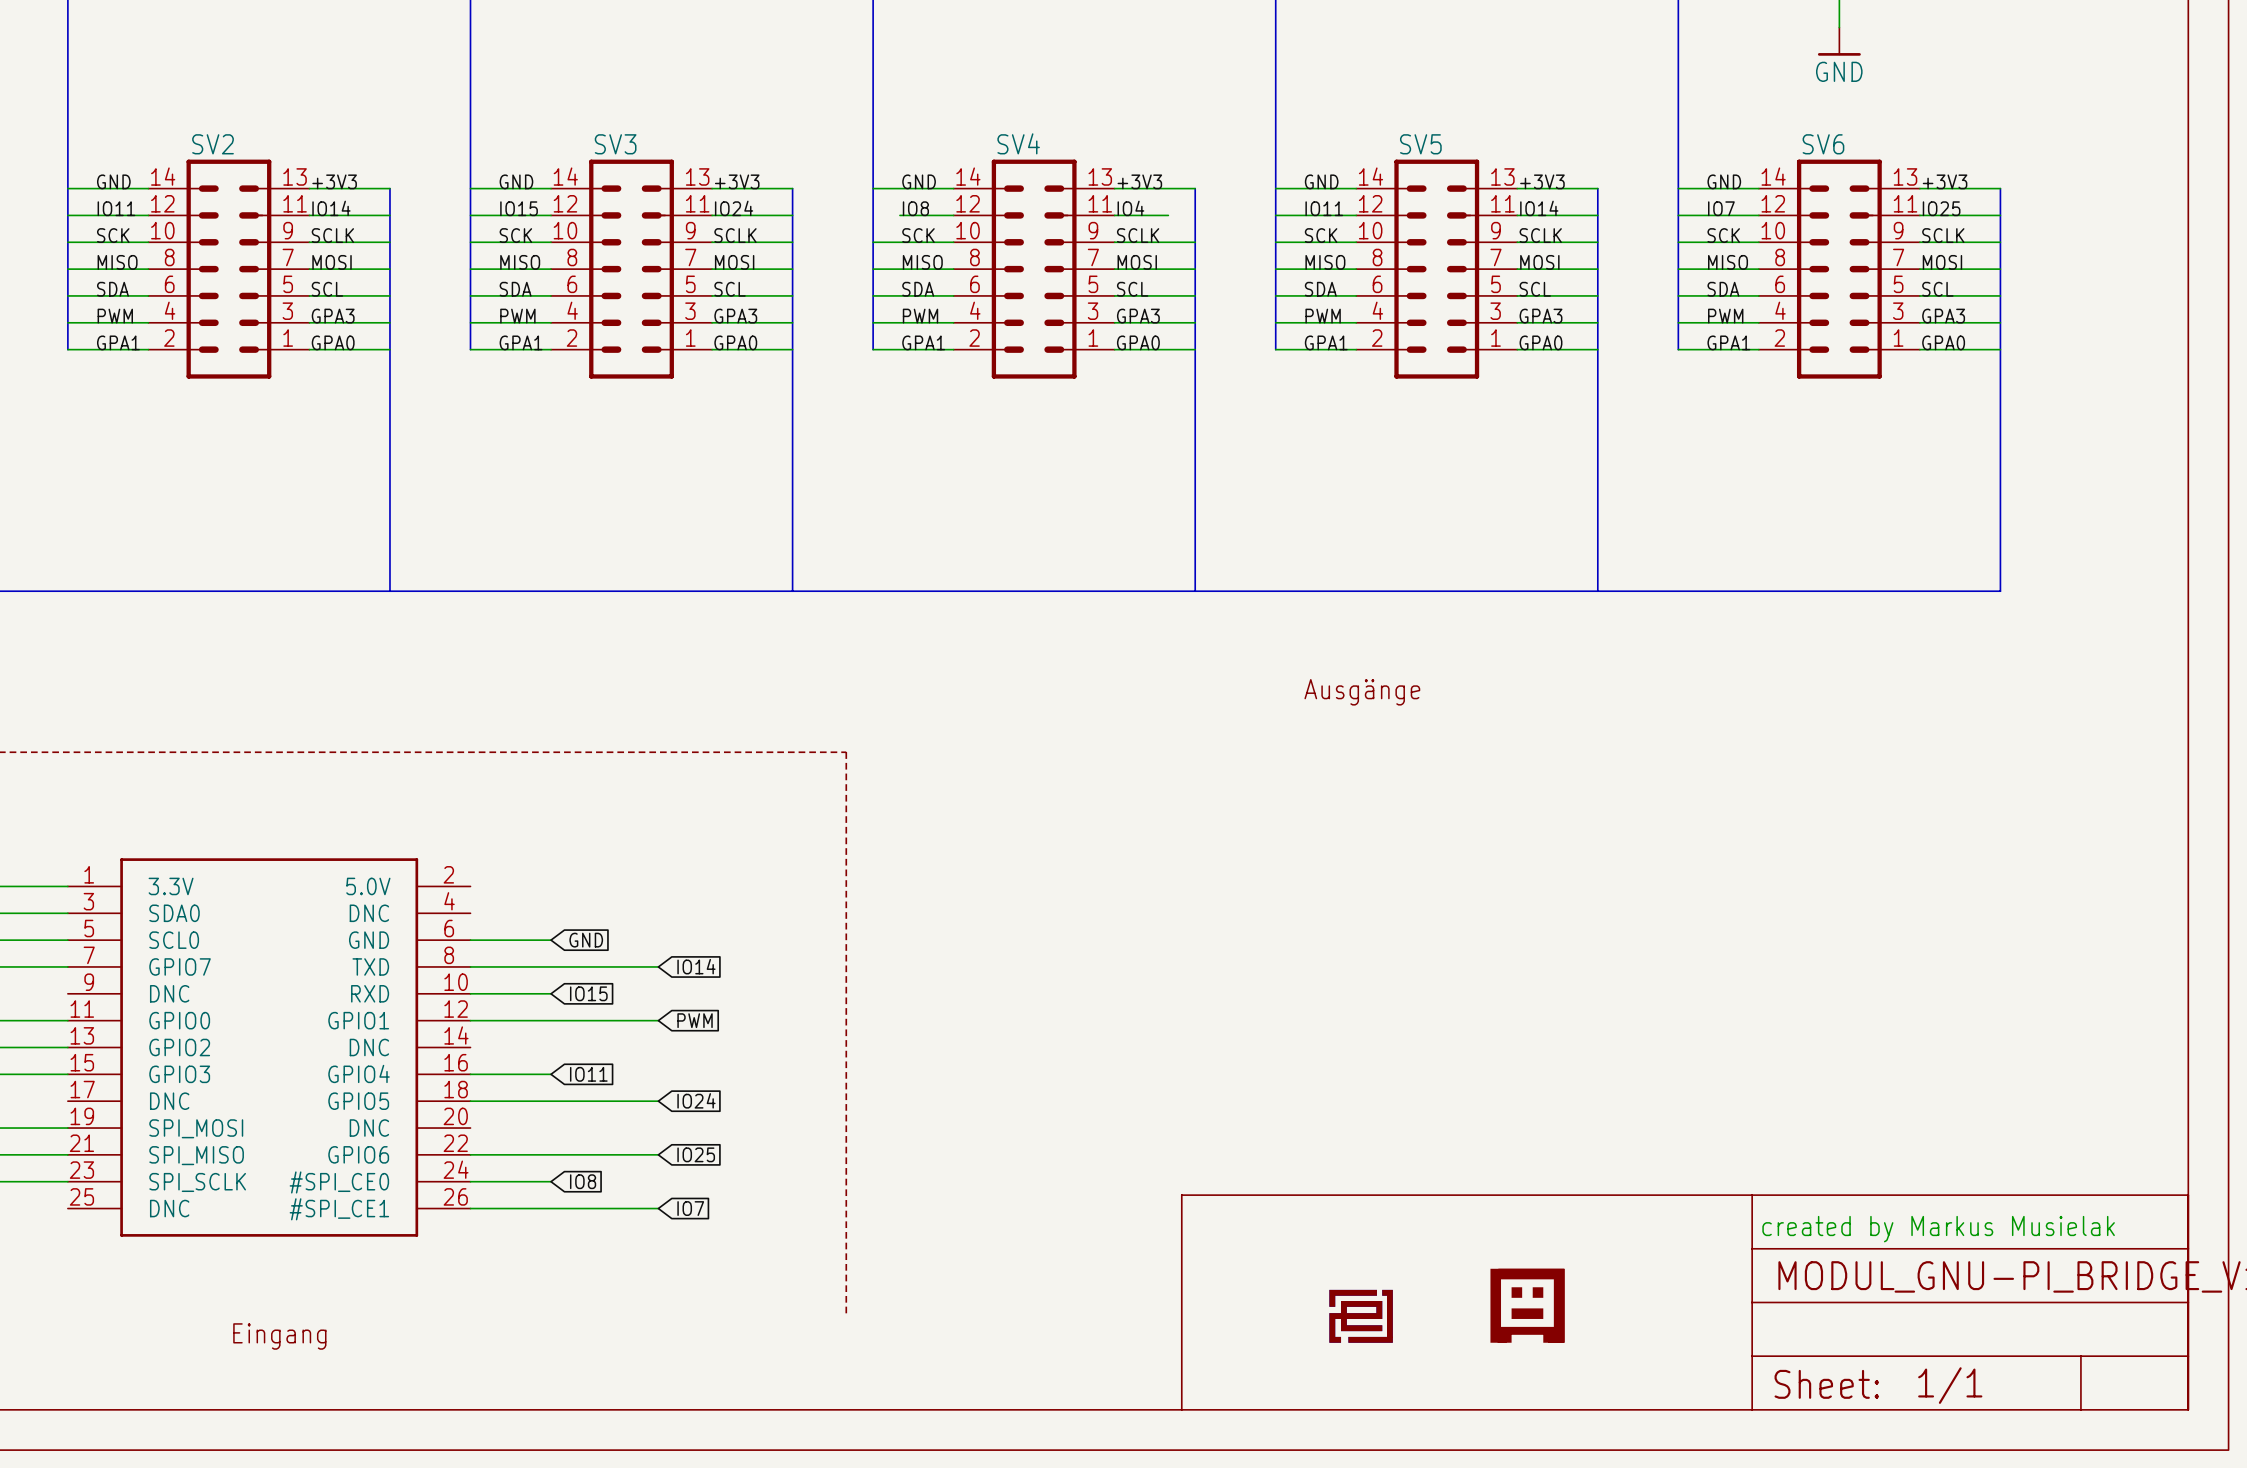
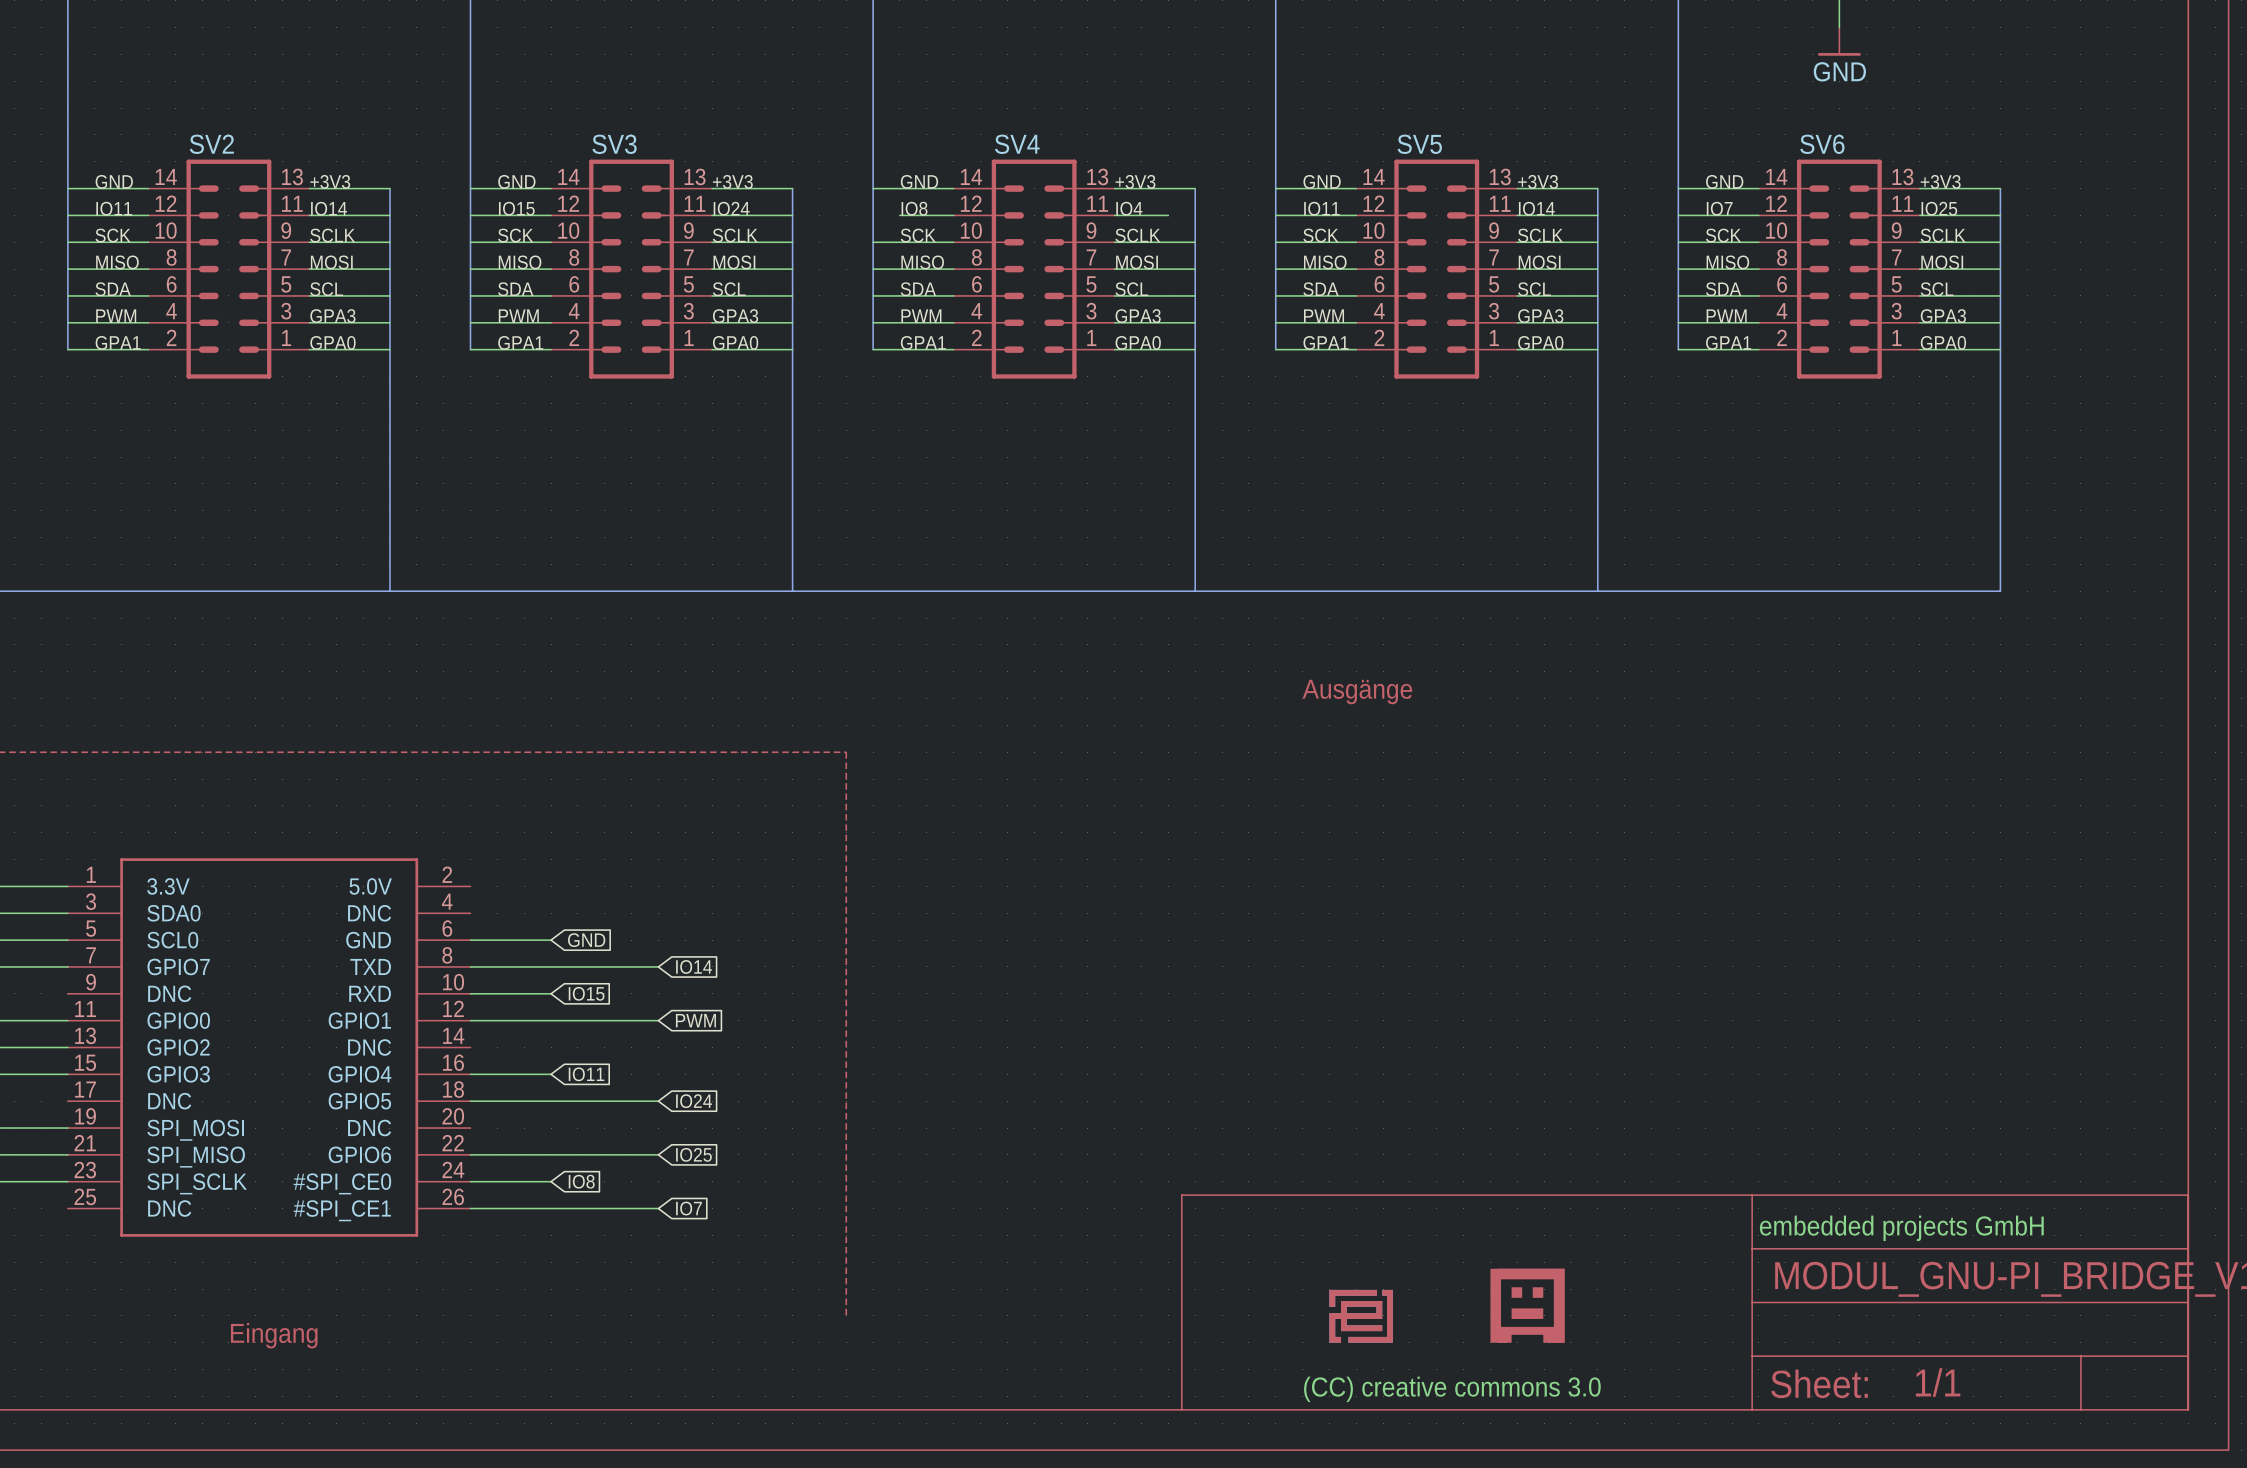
text: created by Markus Musielak (1938, 1229) -> embedded projects GmbH (1901, 1228)
text: none -> (CC) creative commons 3.0 (1452, 1389)

